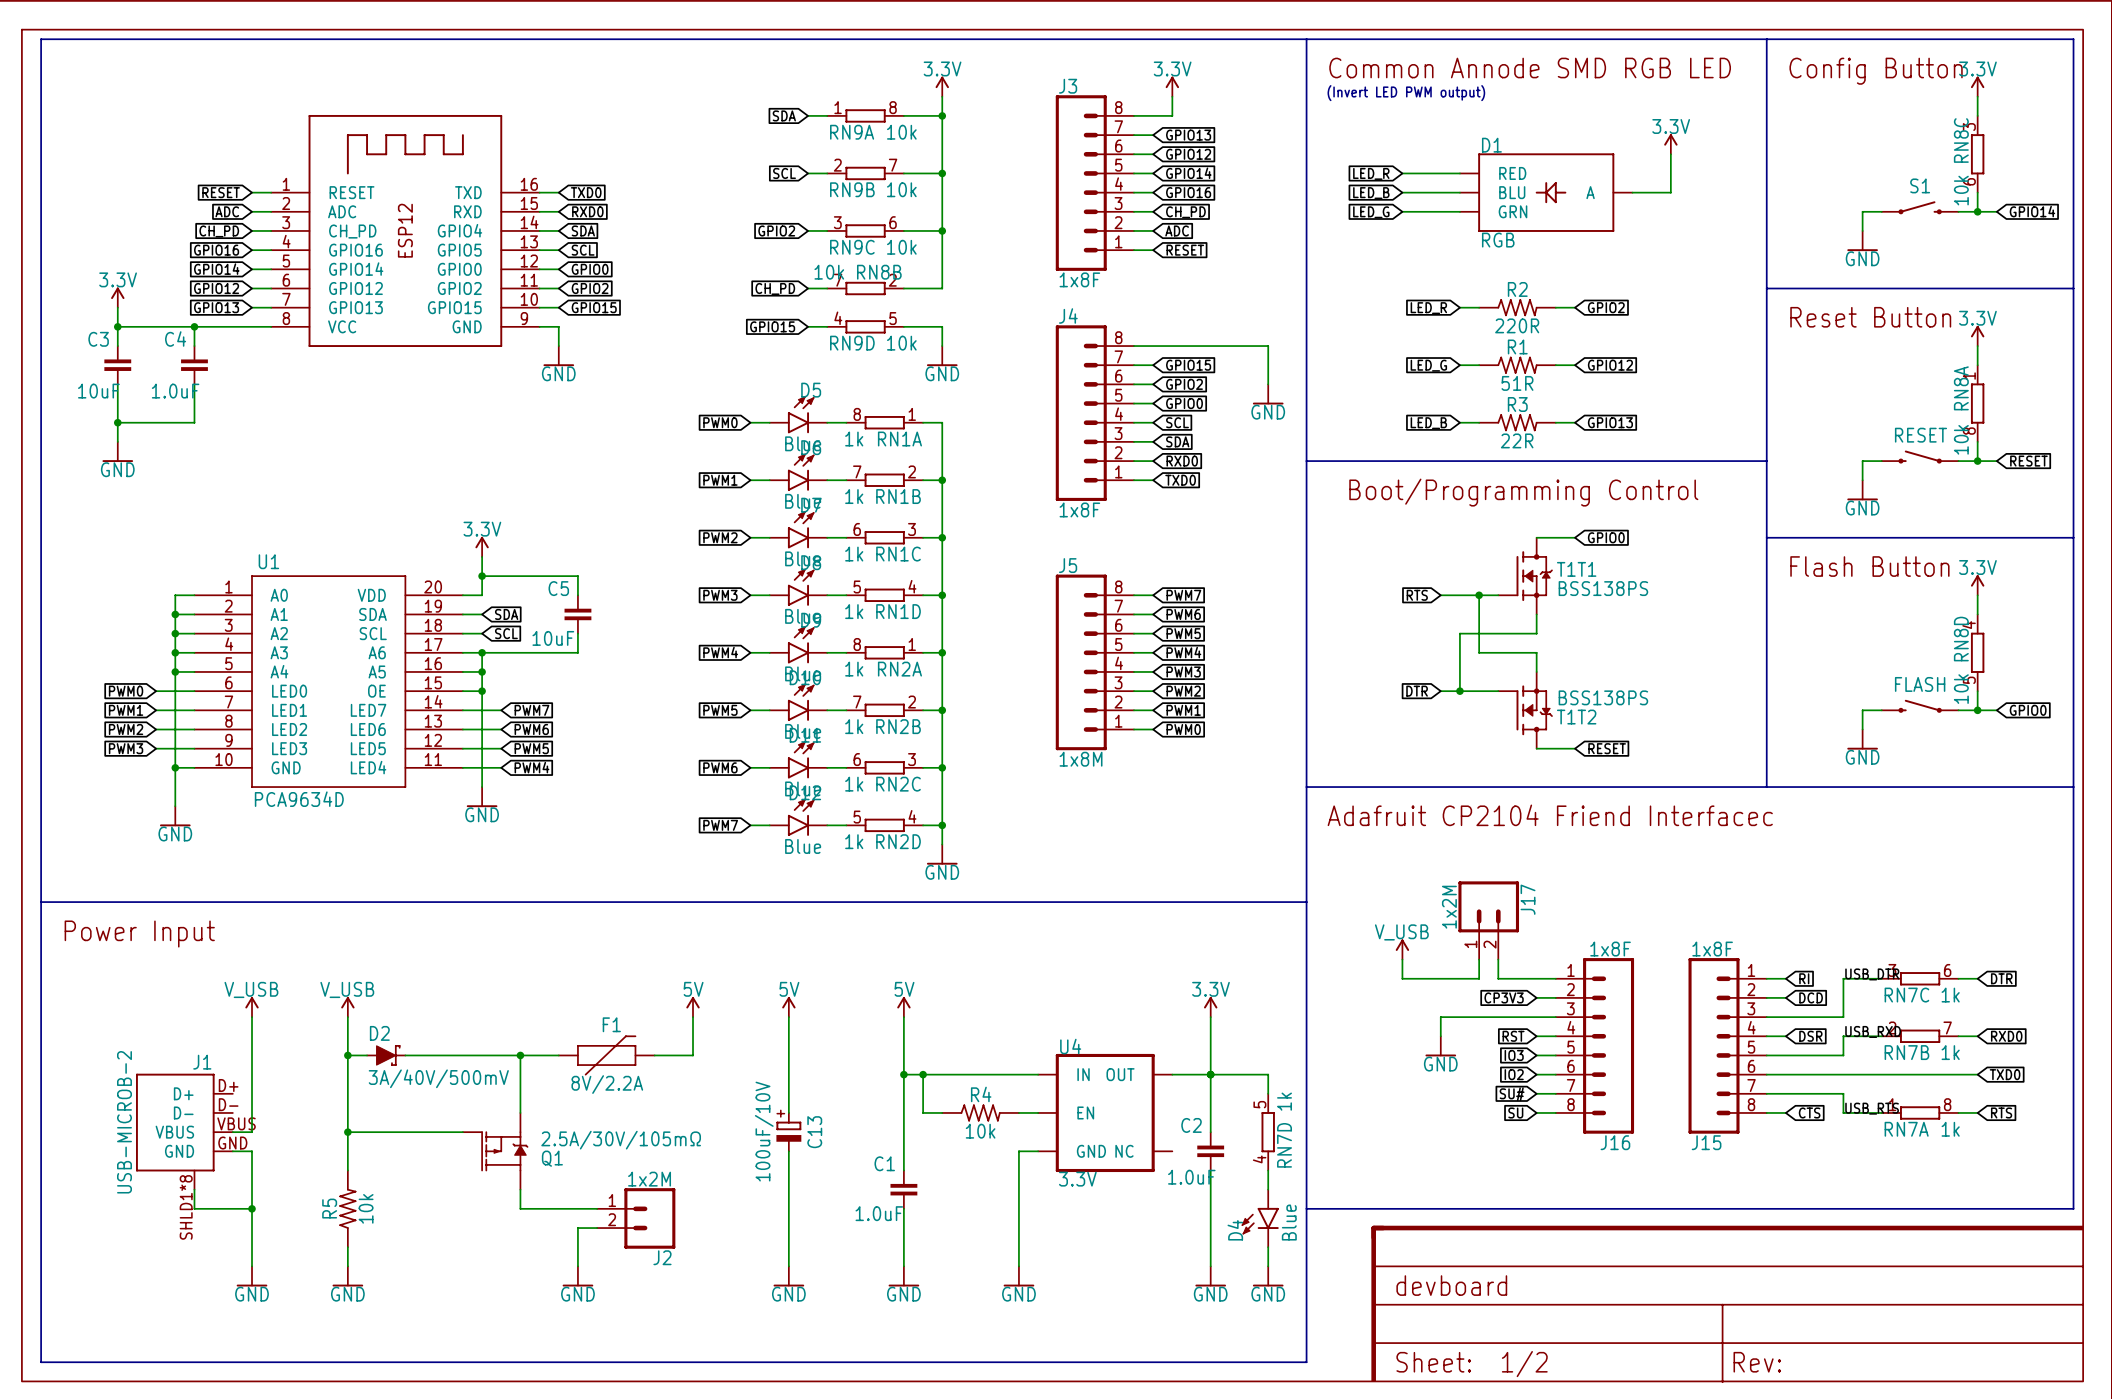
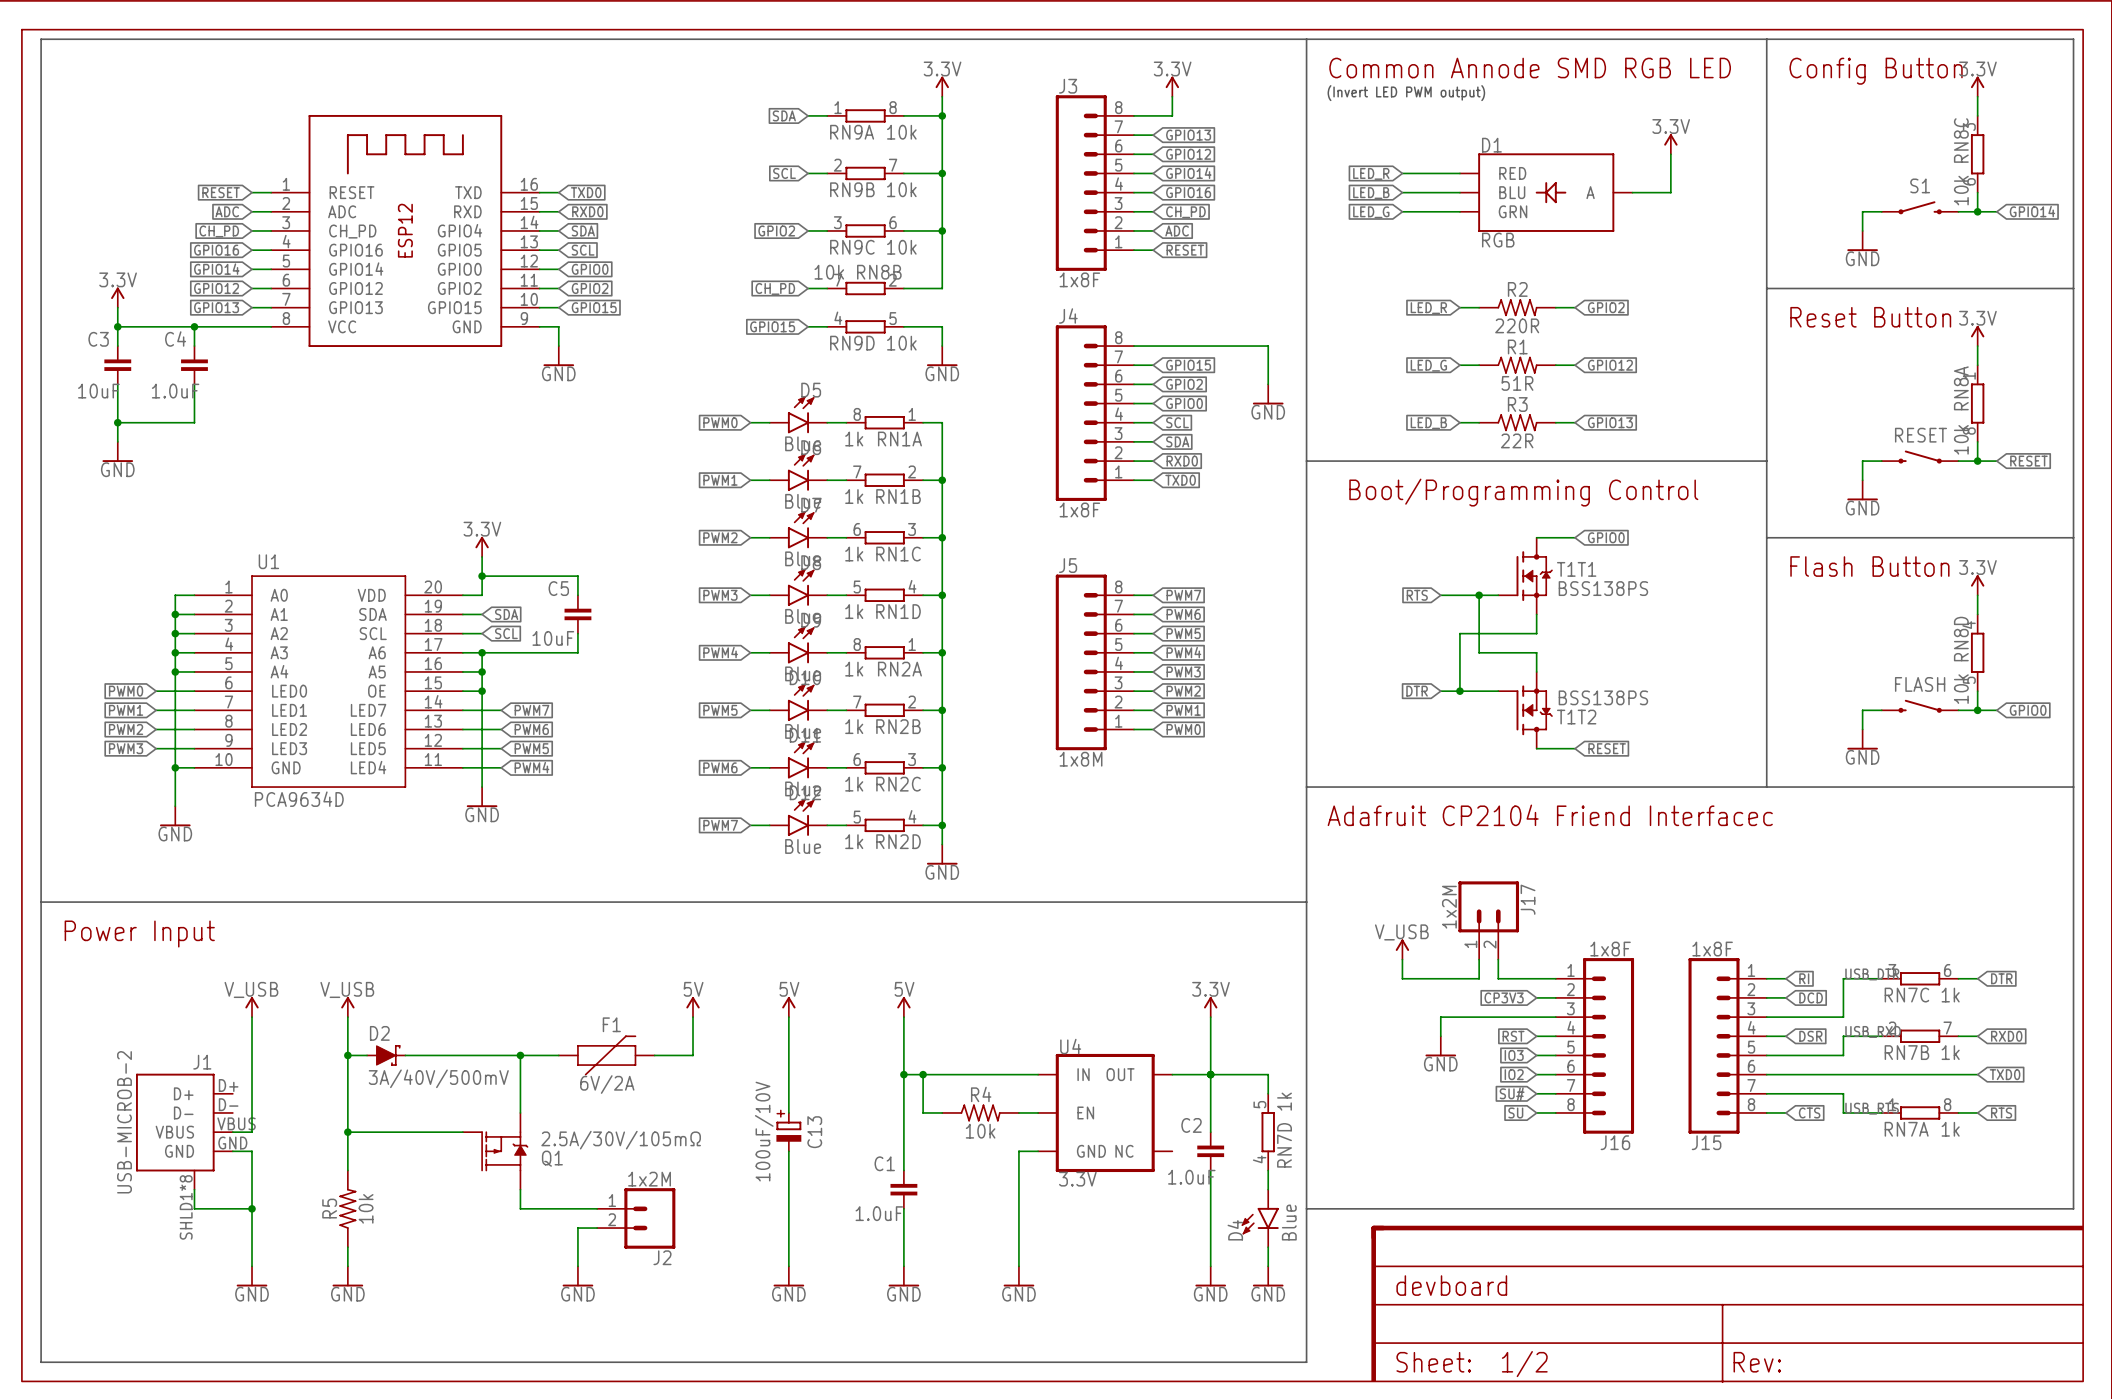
F1 value: 8V/2.2A (607, 1084) -> 6V/2A (607, 1084)

